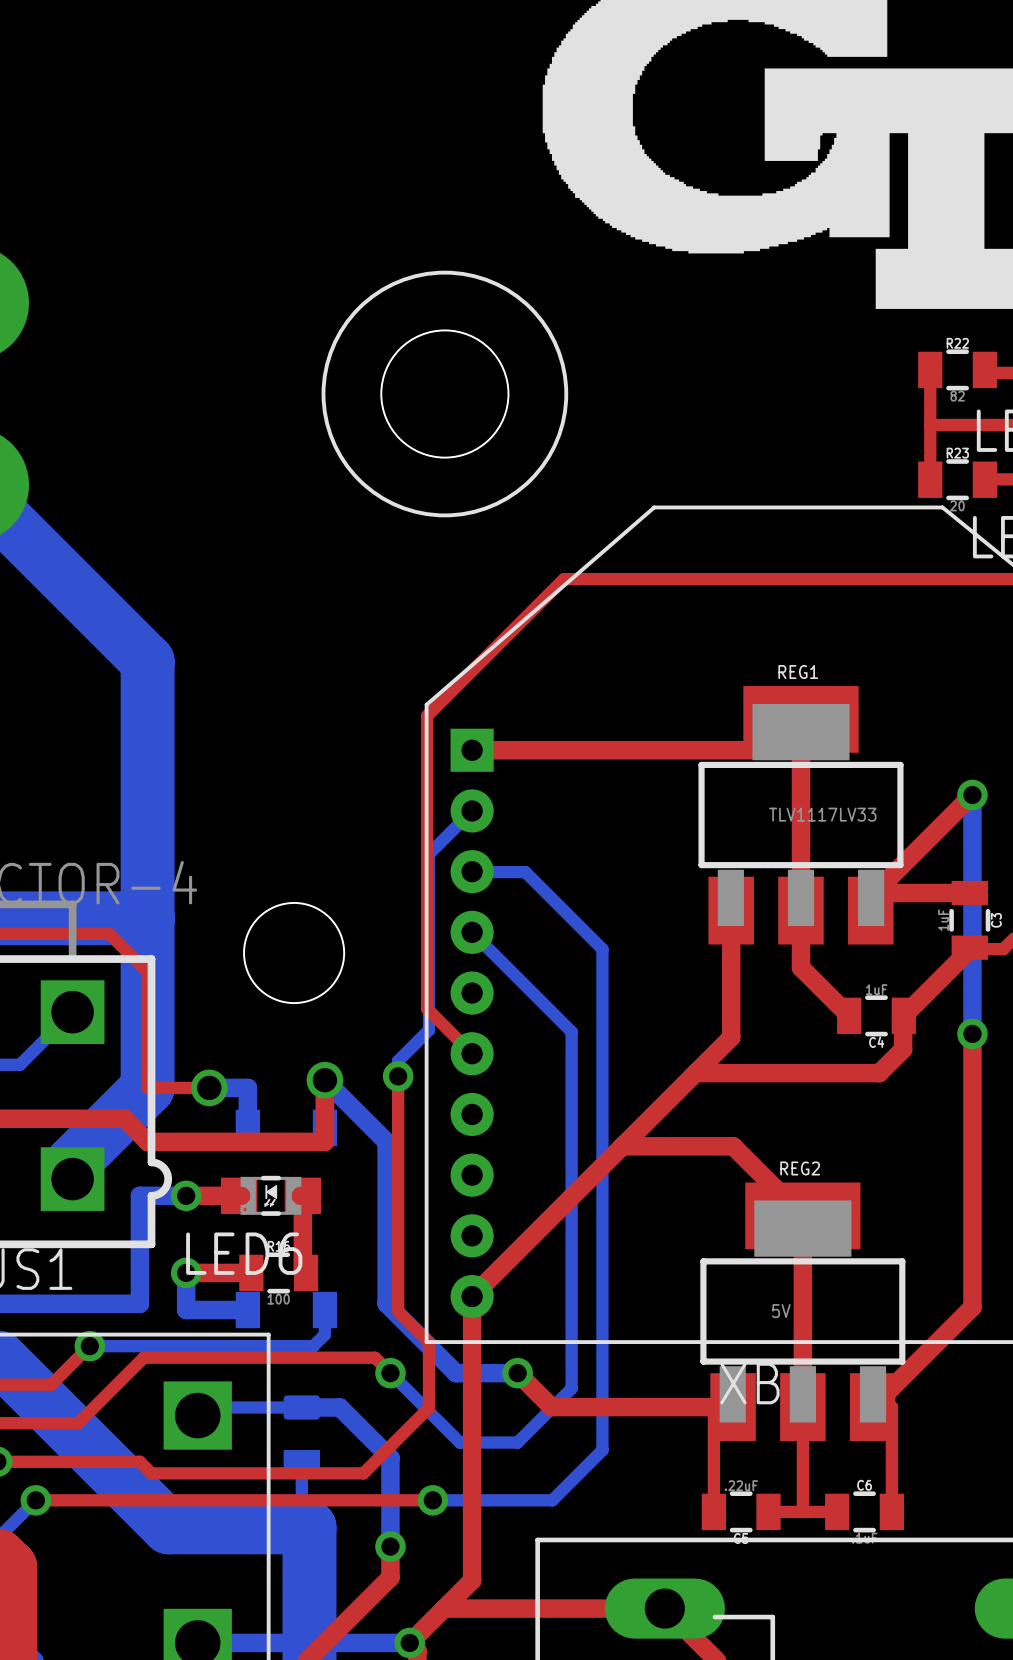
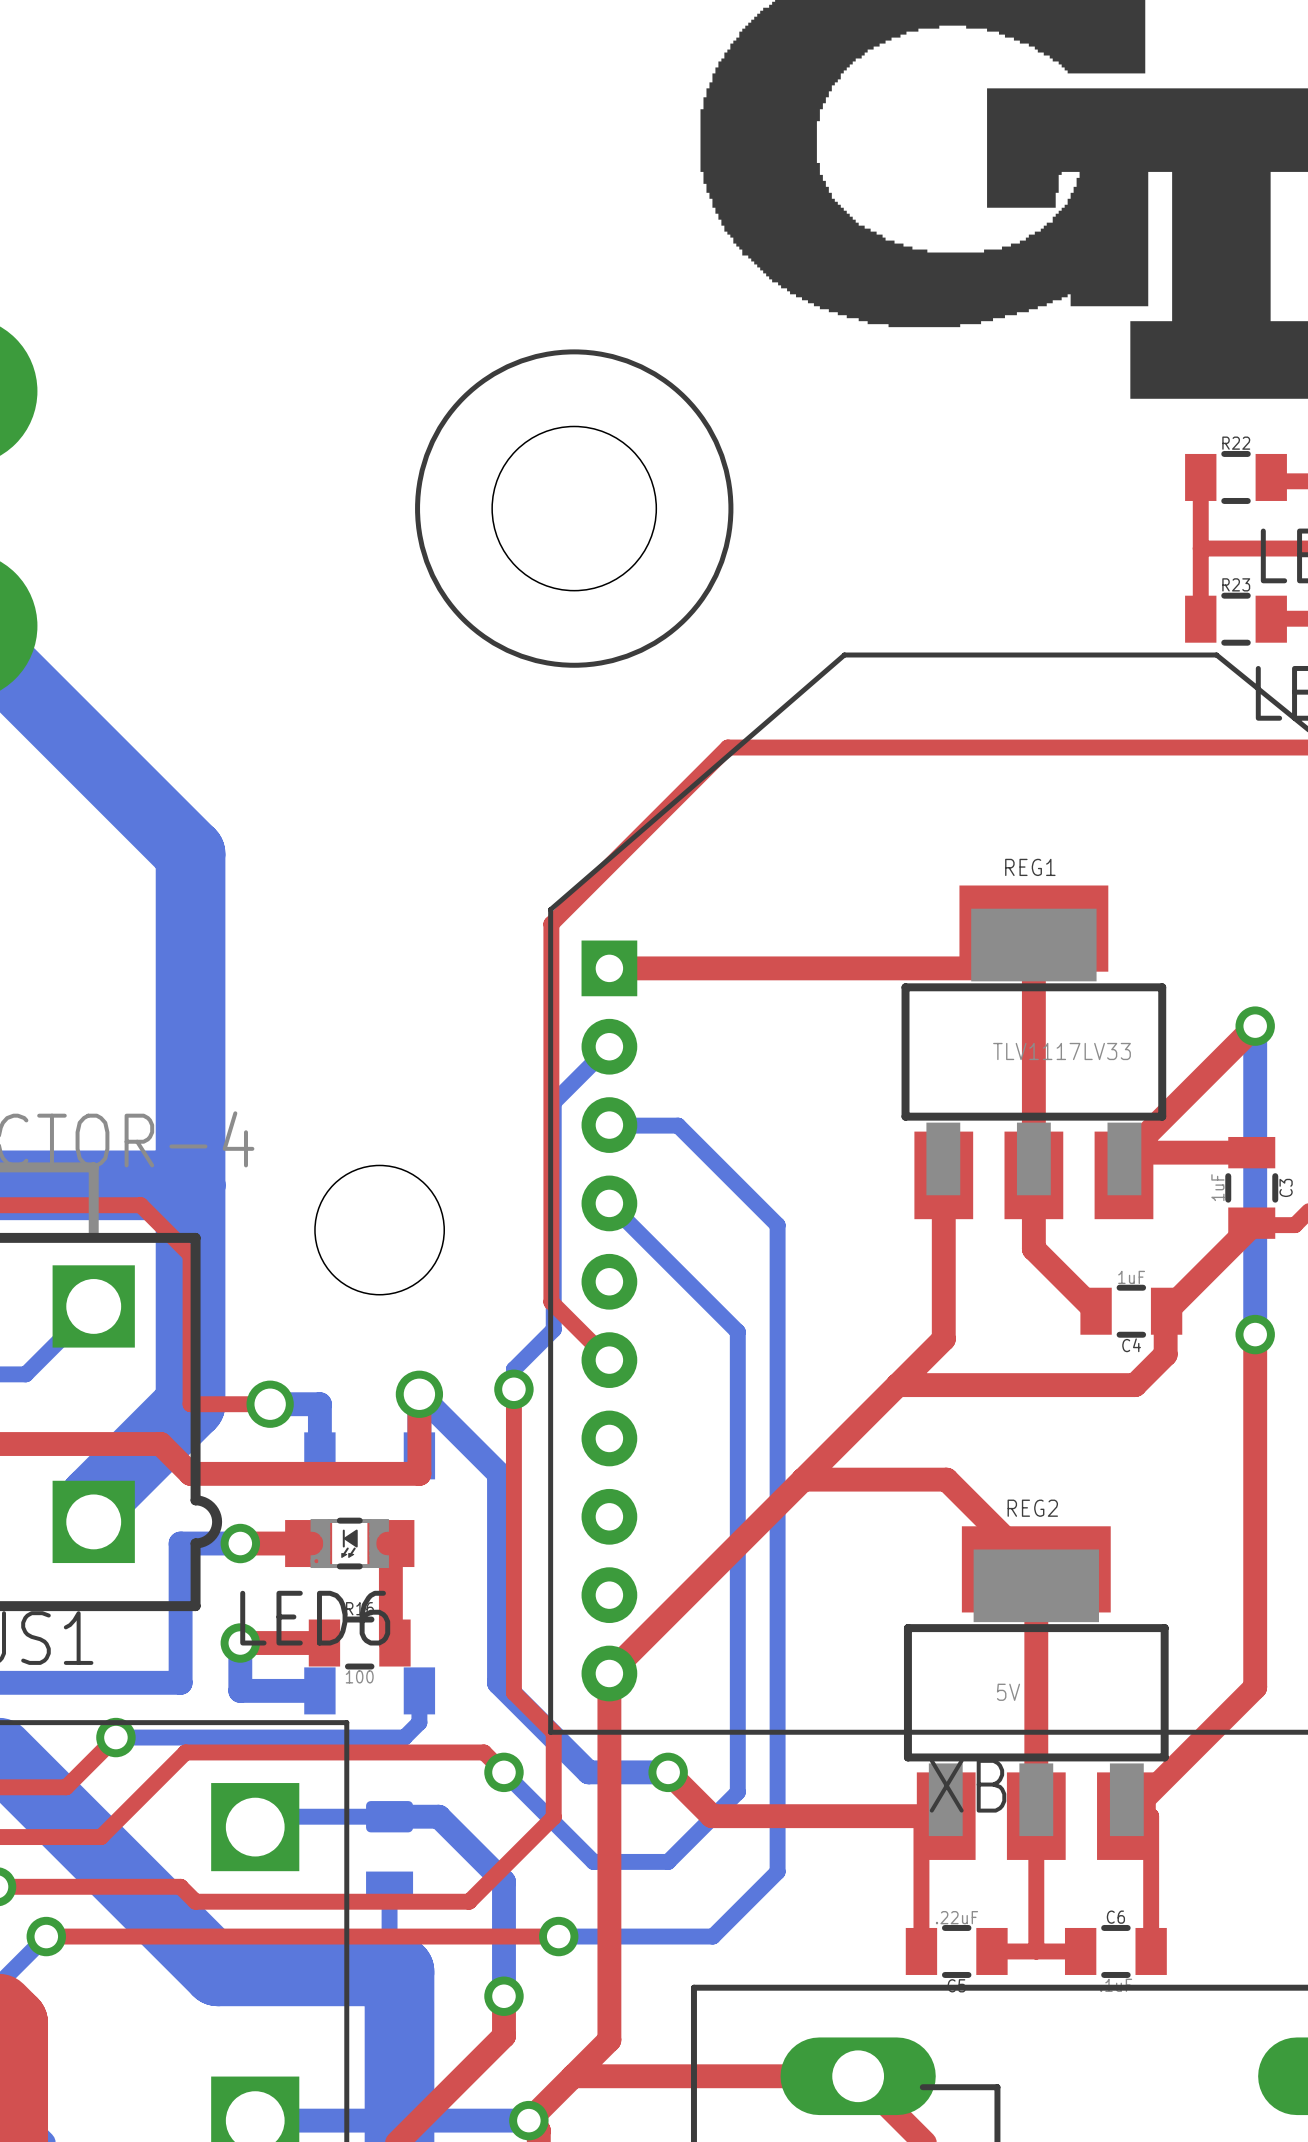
R22 value: 82 (957, 396) -> none
R23 value: 20 (957, 505) -> none

